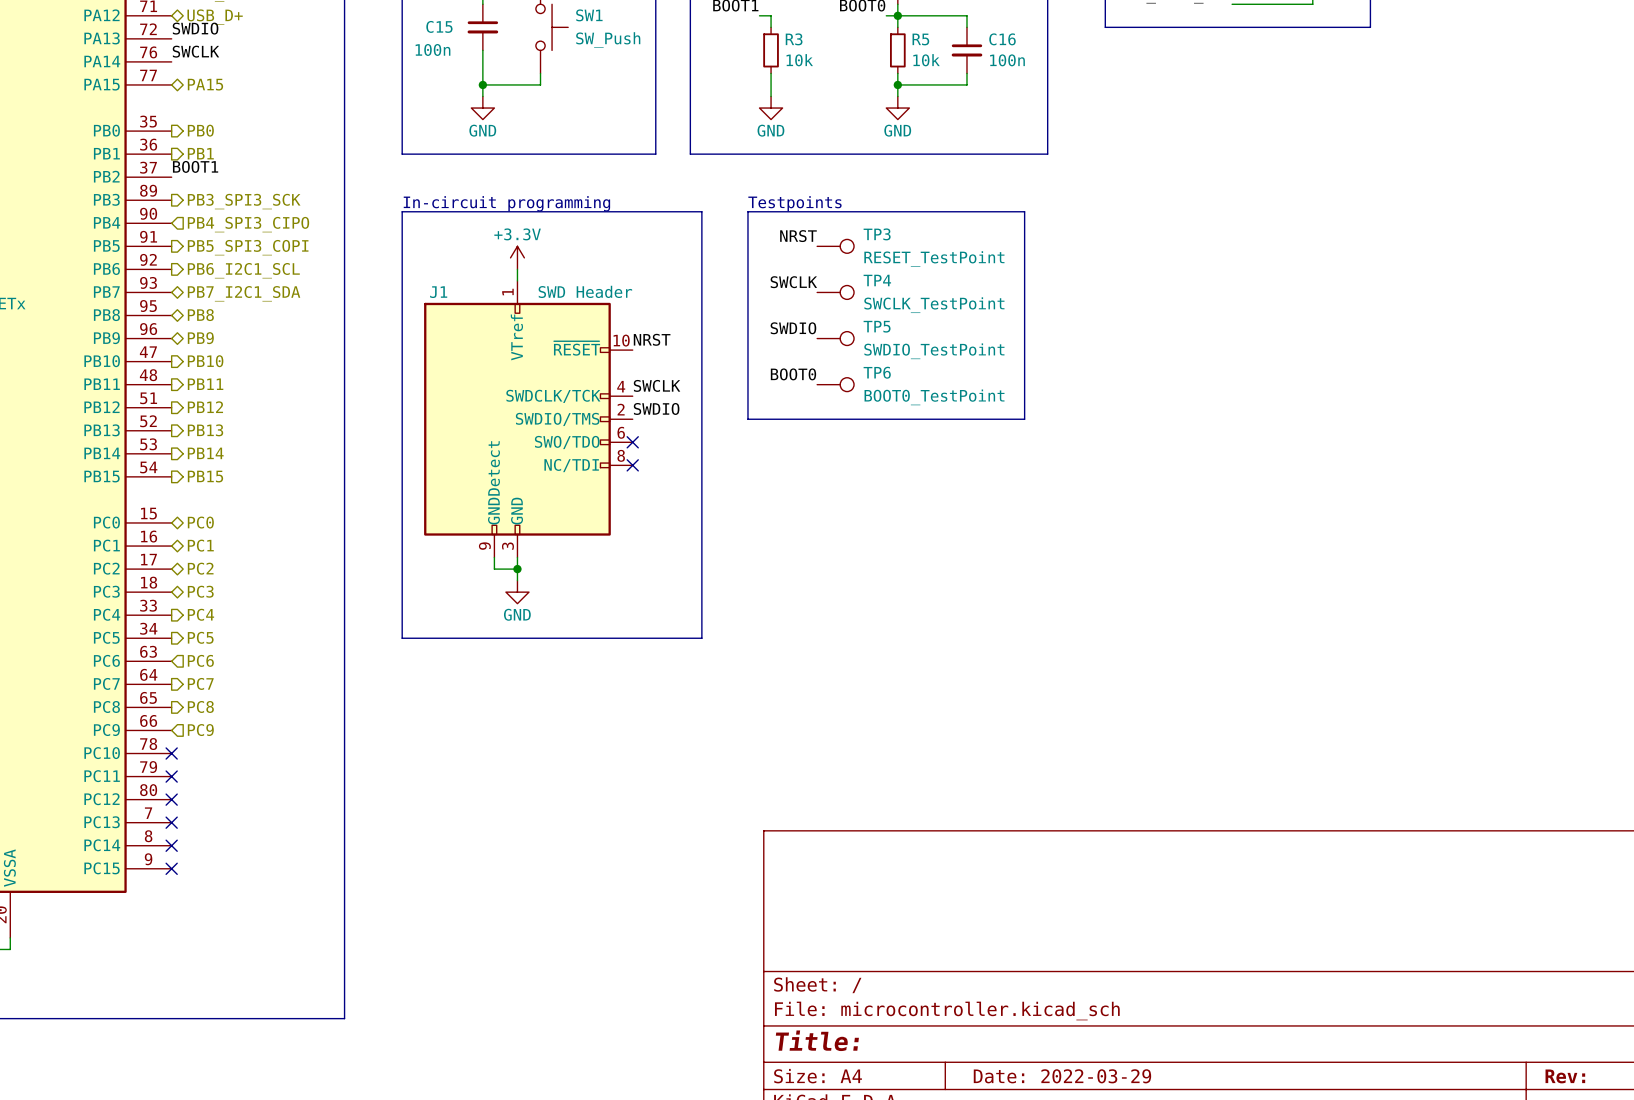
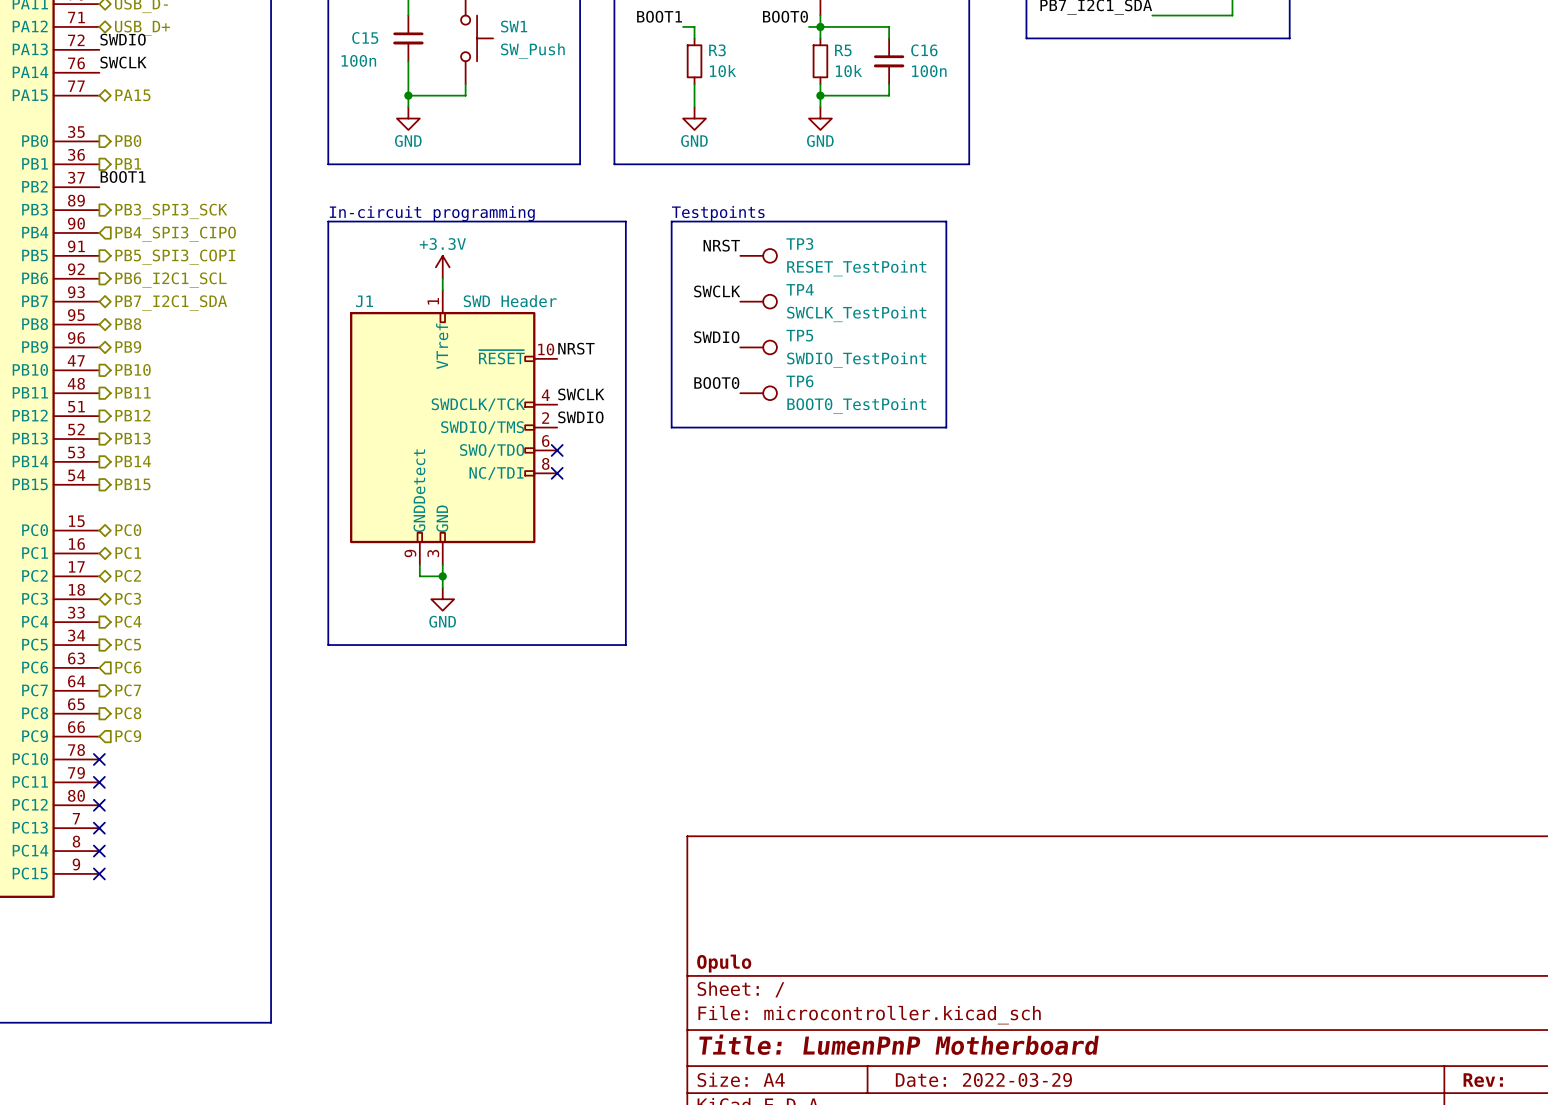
title block: none -> Opulo (724, 963)
title block: Title: (817, 1040) -> Title: LumenPnP Motherboard (899, 1044)

